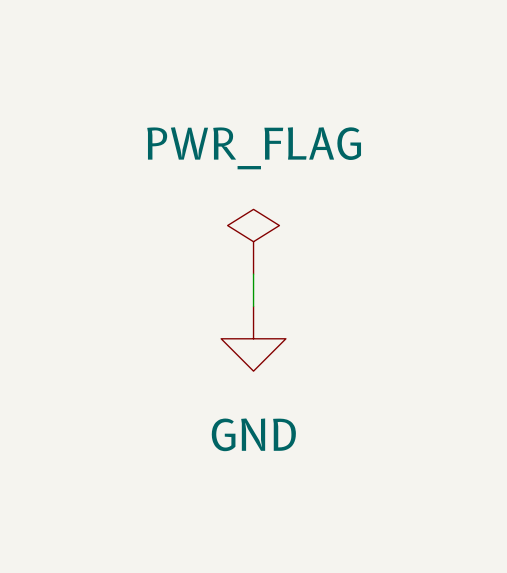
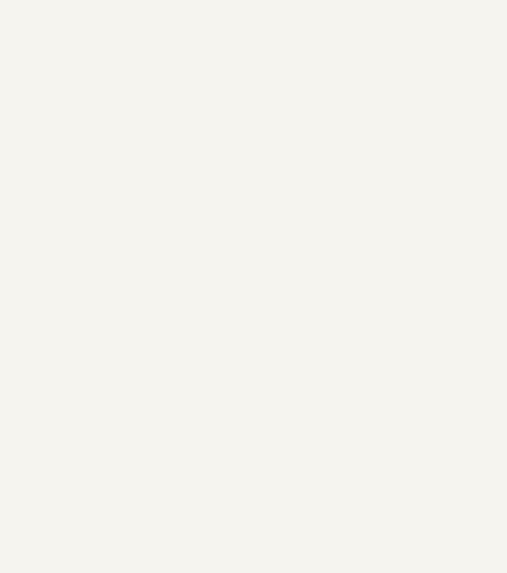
power symbol: PWR_FLAG (253, 241) -> none
wire: (253, 274) (253, 306) -> none
power symbol: GND (253, 338) -> none

